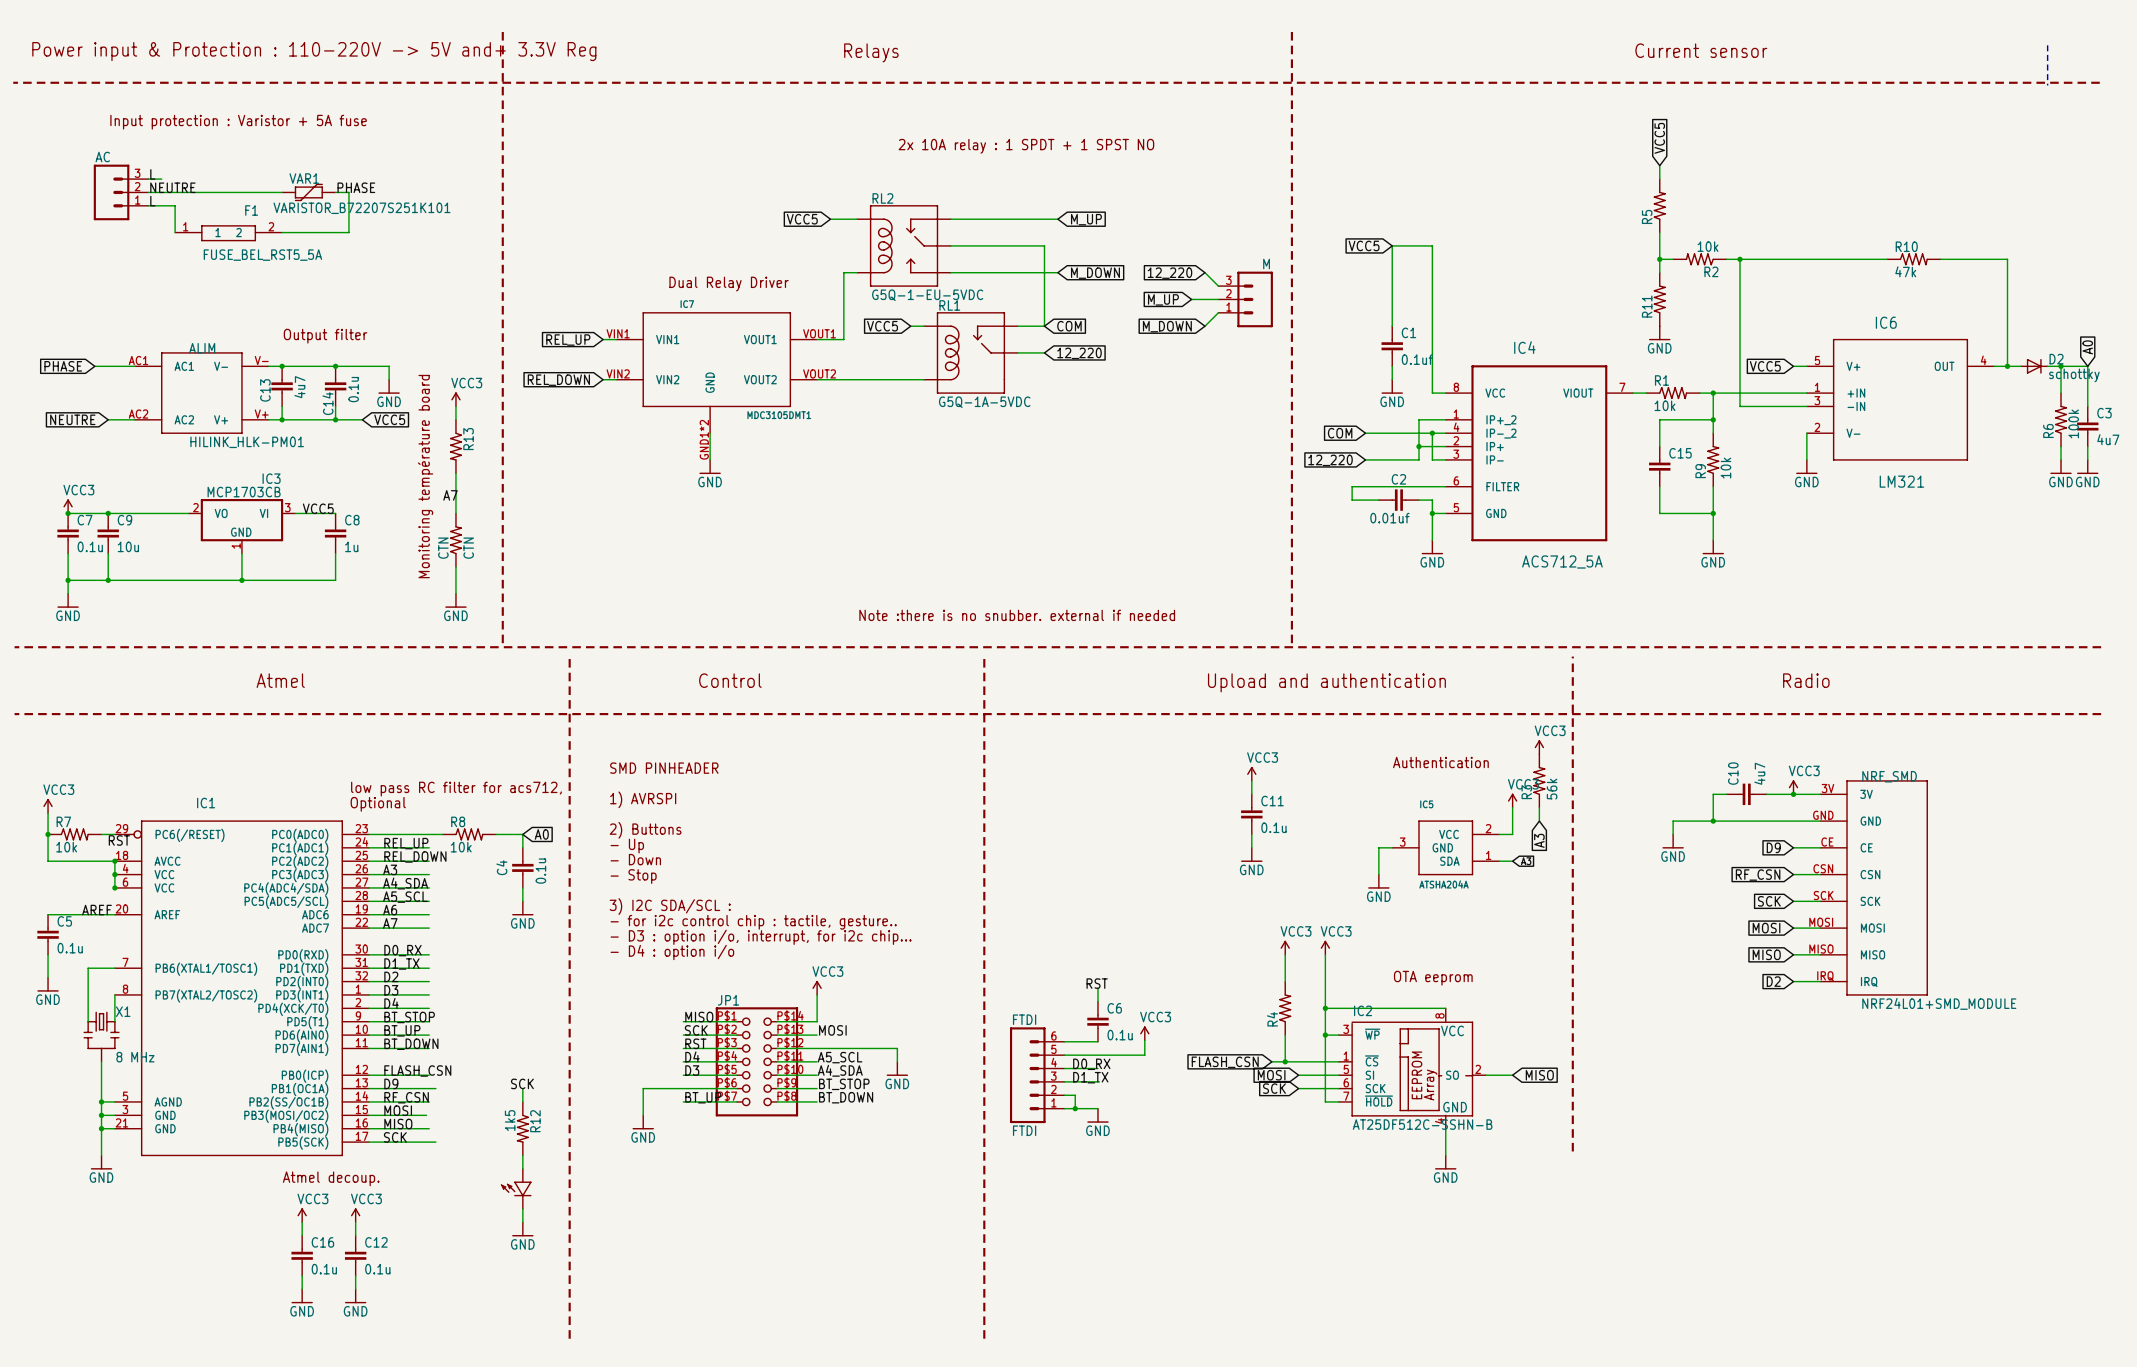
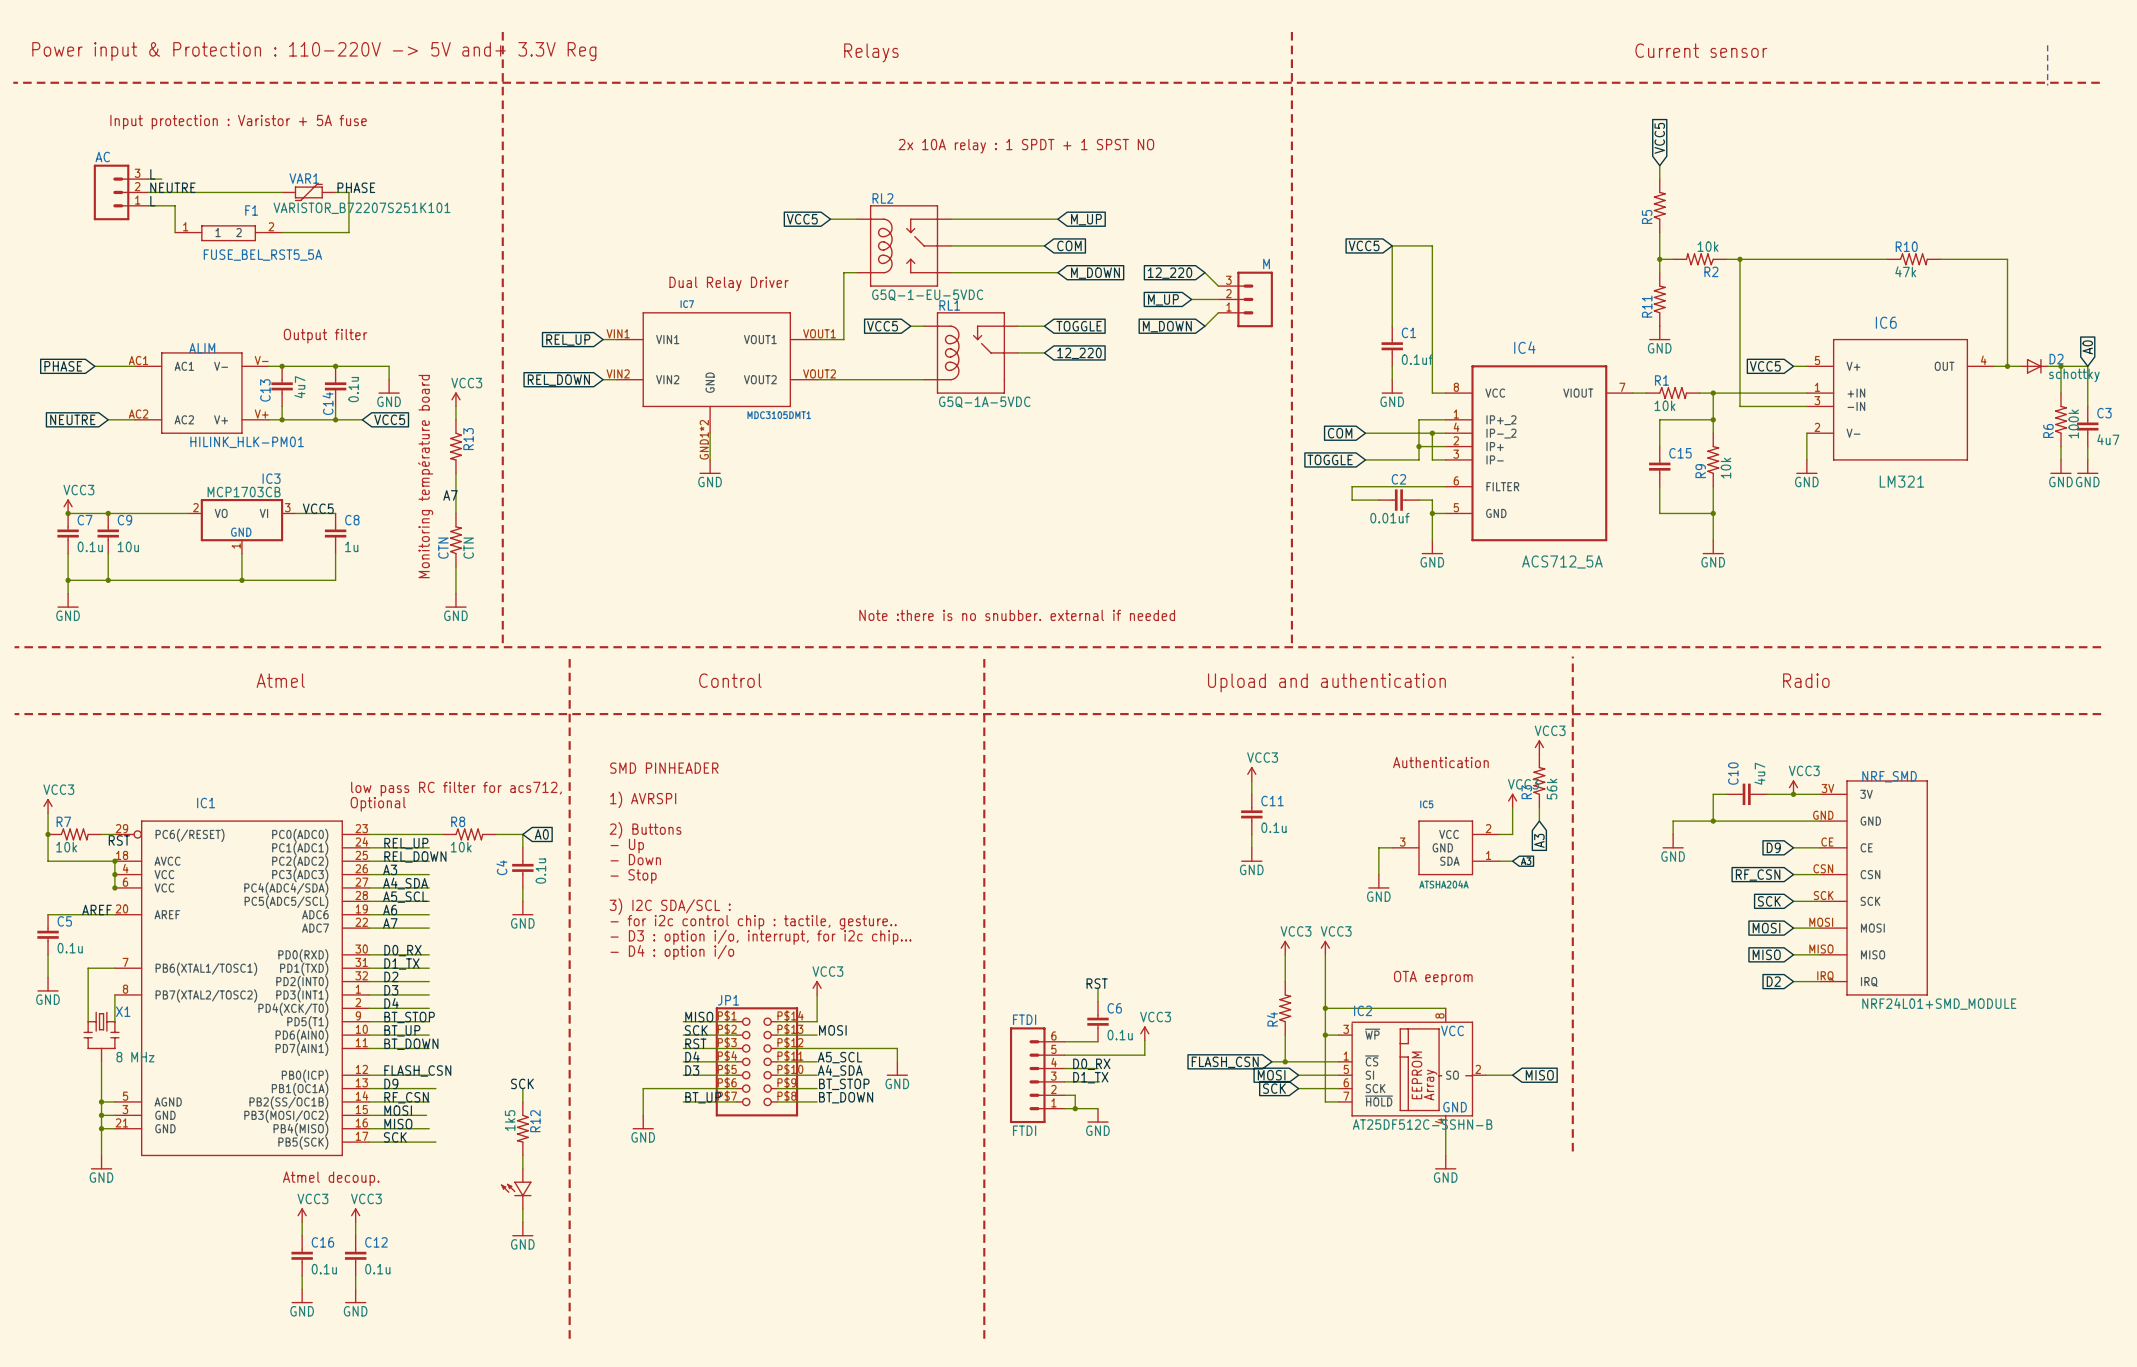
wire: (1044, 245) (1044, 326) -> none
global label: none -> COM (1069, 245)
global label: COM (1069, 326) -> TOGGLE (1079, 326)
global label: 12_220 (1330, 460) -> TOGGLE (1330, 459)

